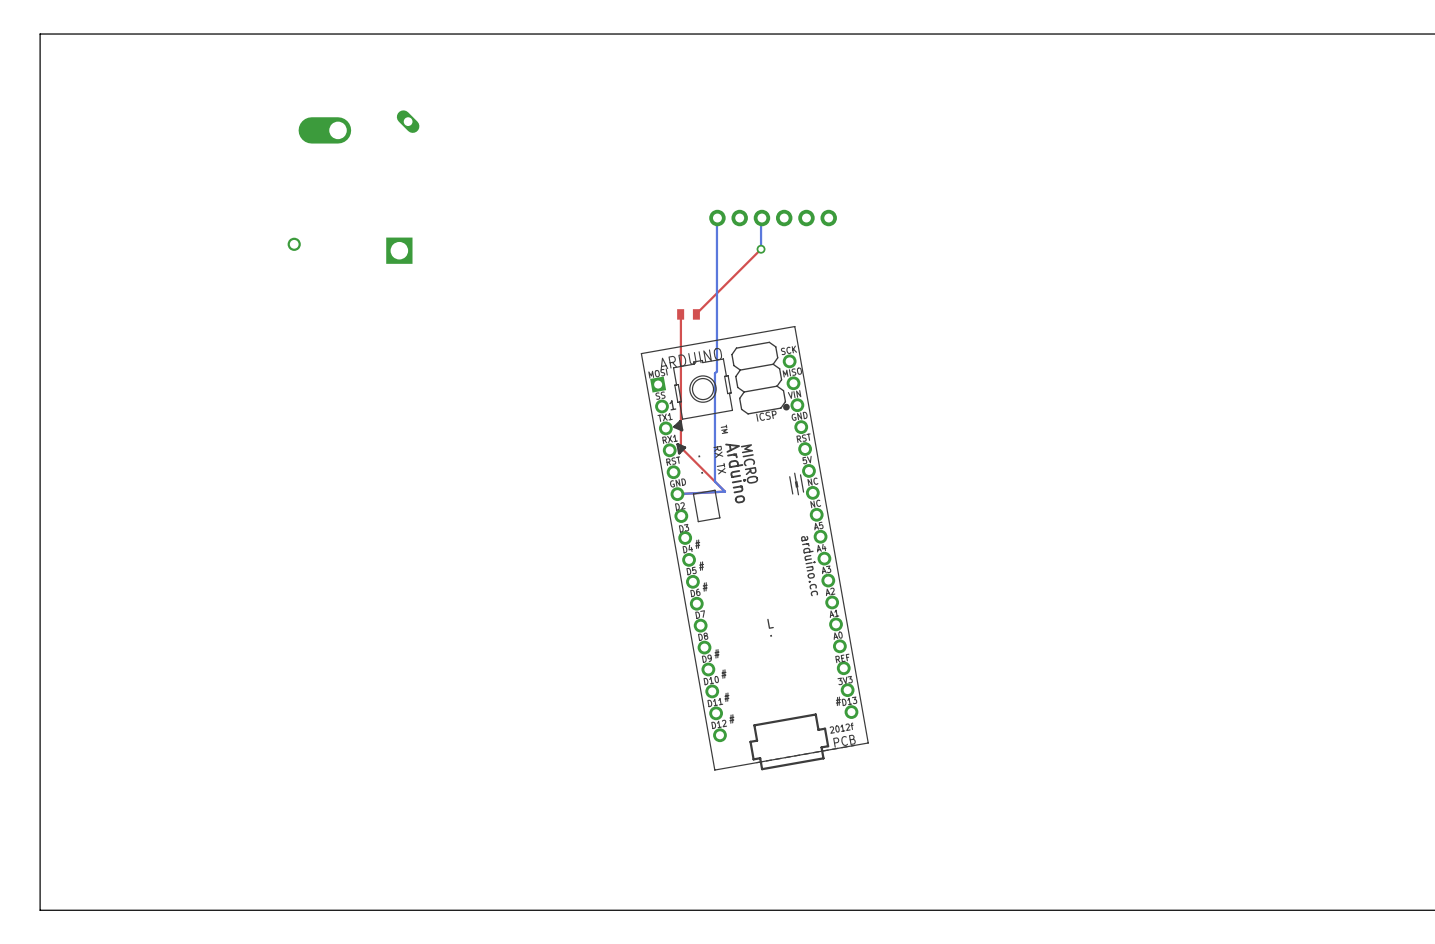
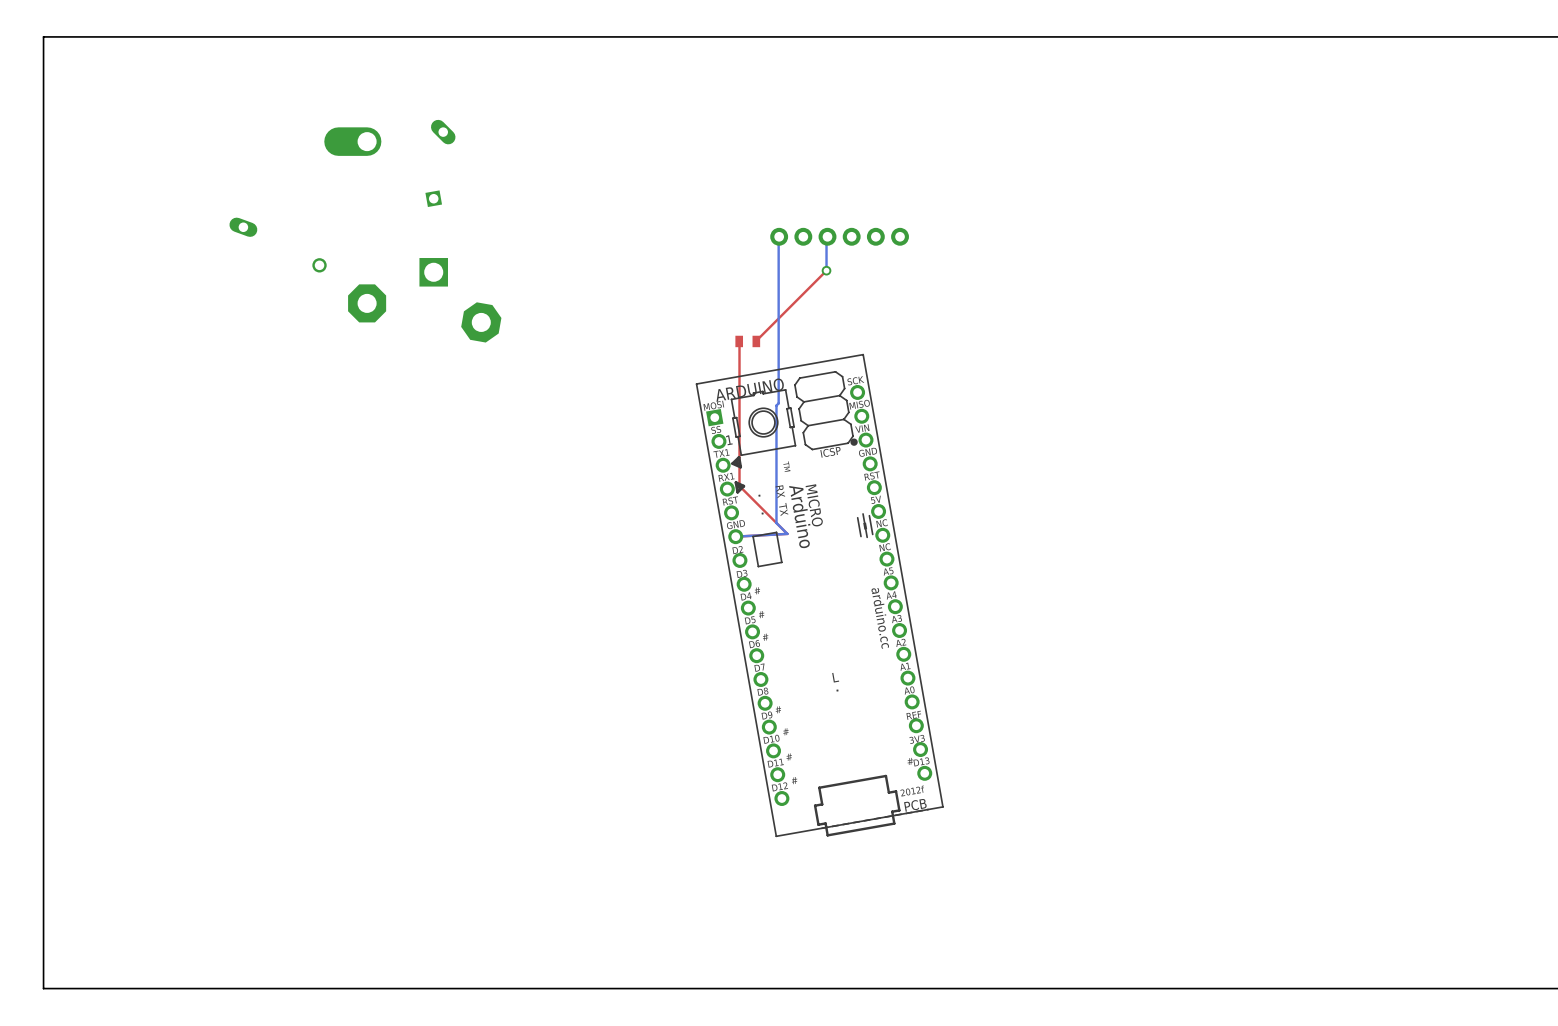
part: none -> (433, 198)
part: none -> (243, 227)
part: none -> (367, 303)
part: none -> (481, 322)

